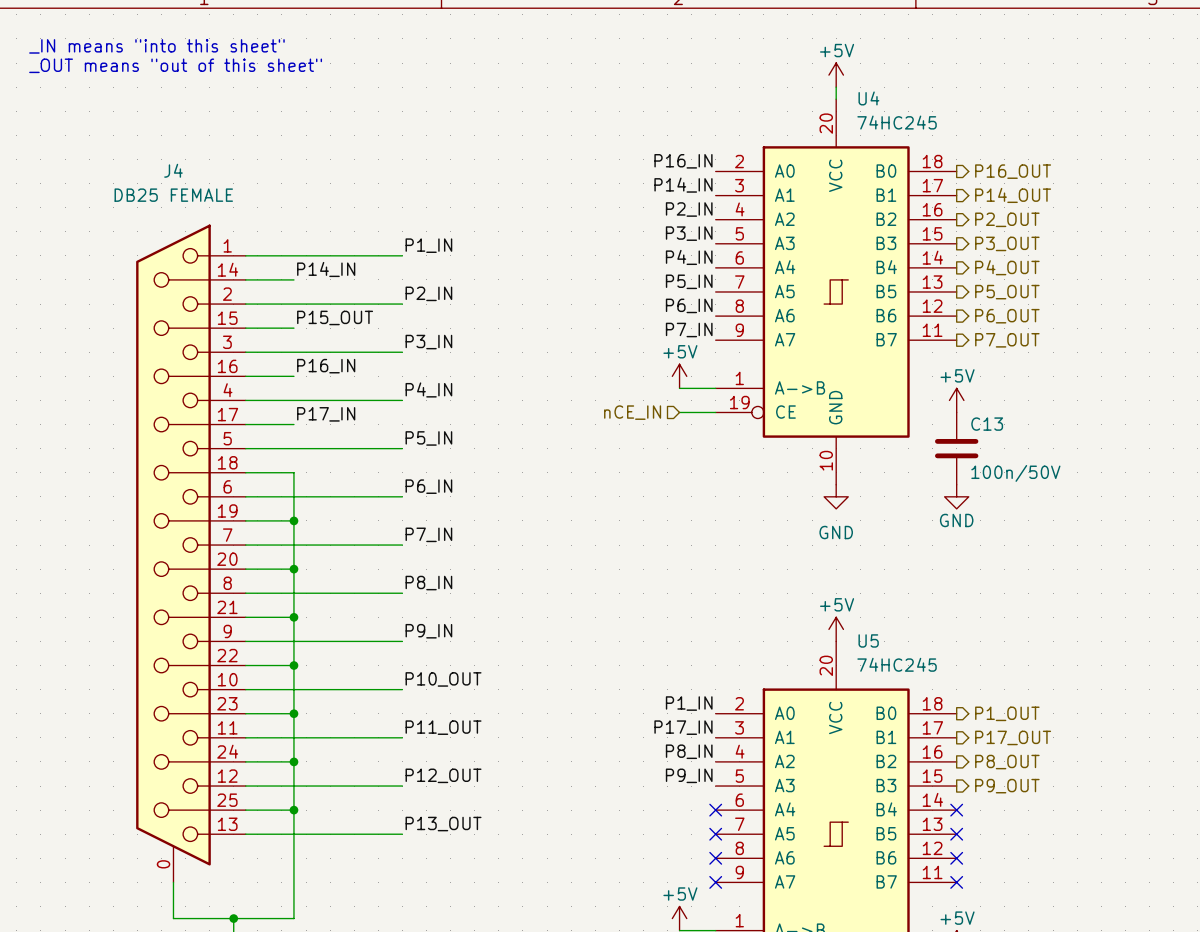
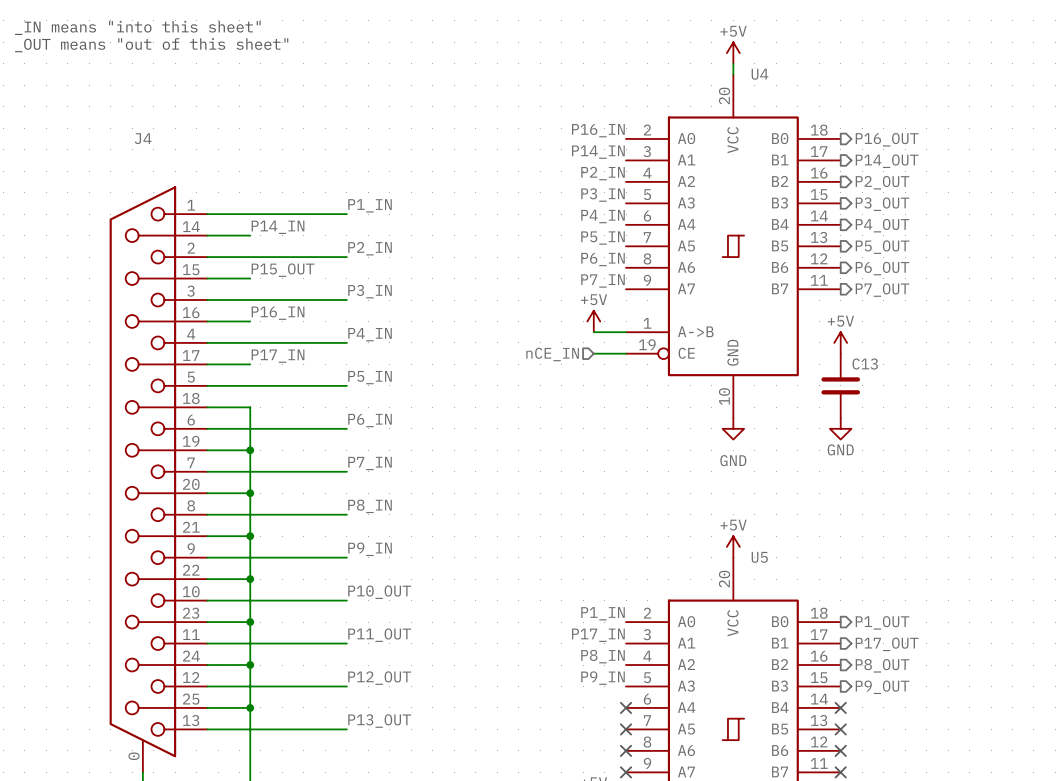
U4 value: 74HC245 (897, 122) -> none
J4 value: DB25 FEMALE (173, 195) -> none
C13 value: 100n/50V (1015, 473) -> none
U5 value: 74HC245 (897, 664) -> none

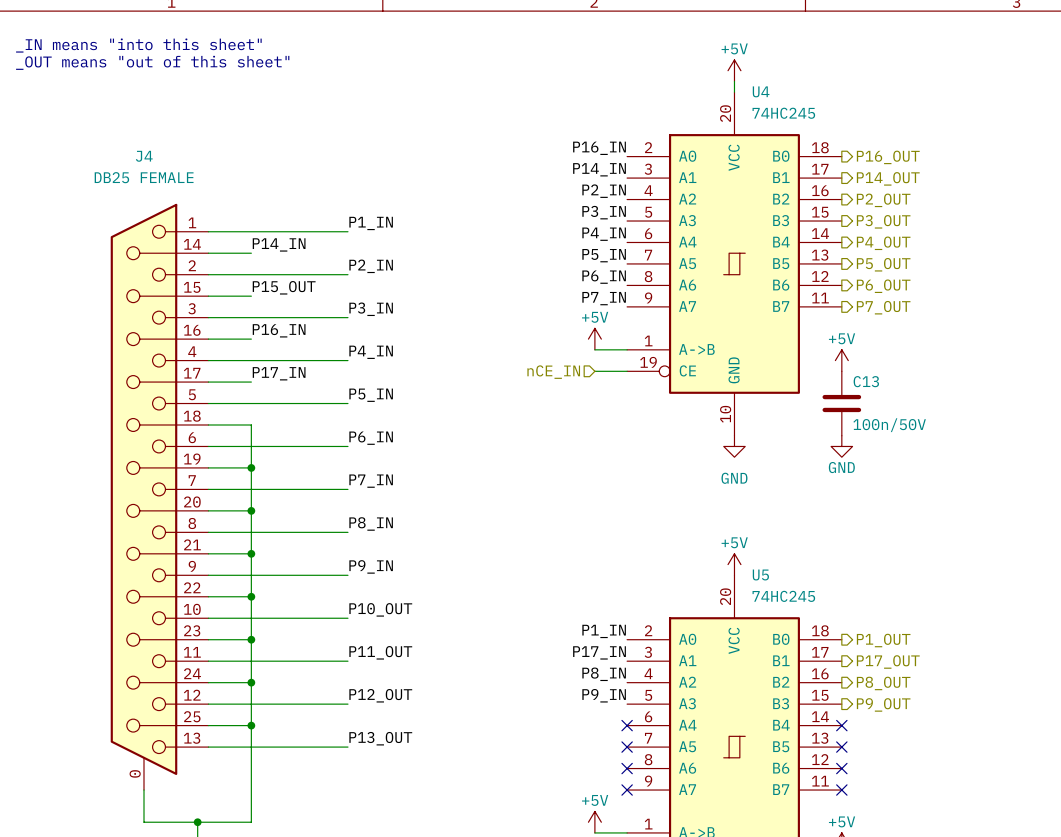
U4 value: none -> 74HC245 (783, 113)
J4 value: none -> DB25 FEMALE (144, 177)
C13 value: none -> 100n/50V (889, 425)
U5 value: none -> 74HC245 (783, 596)

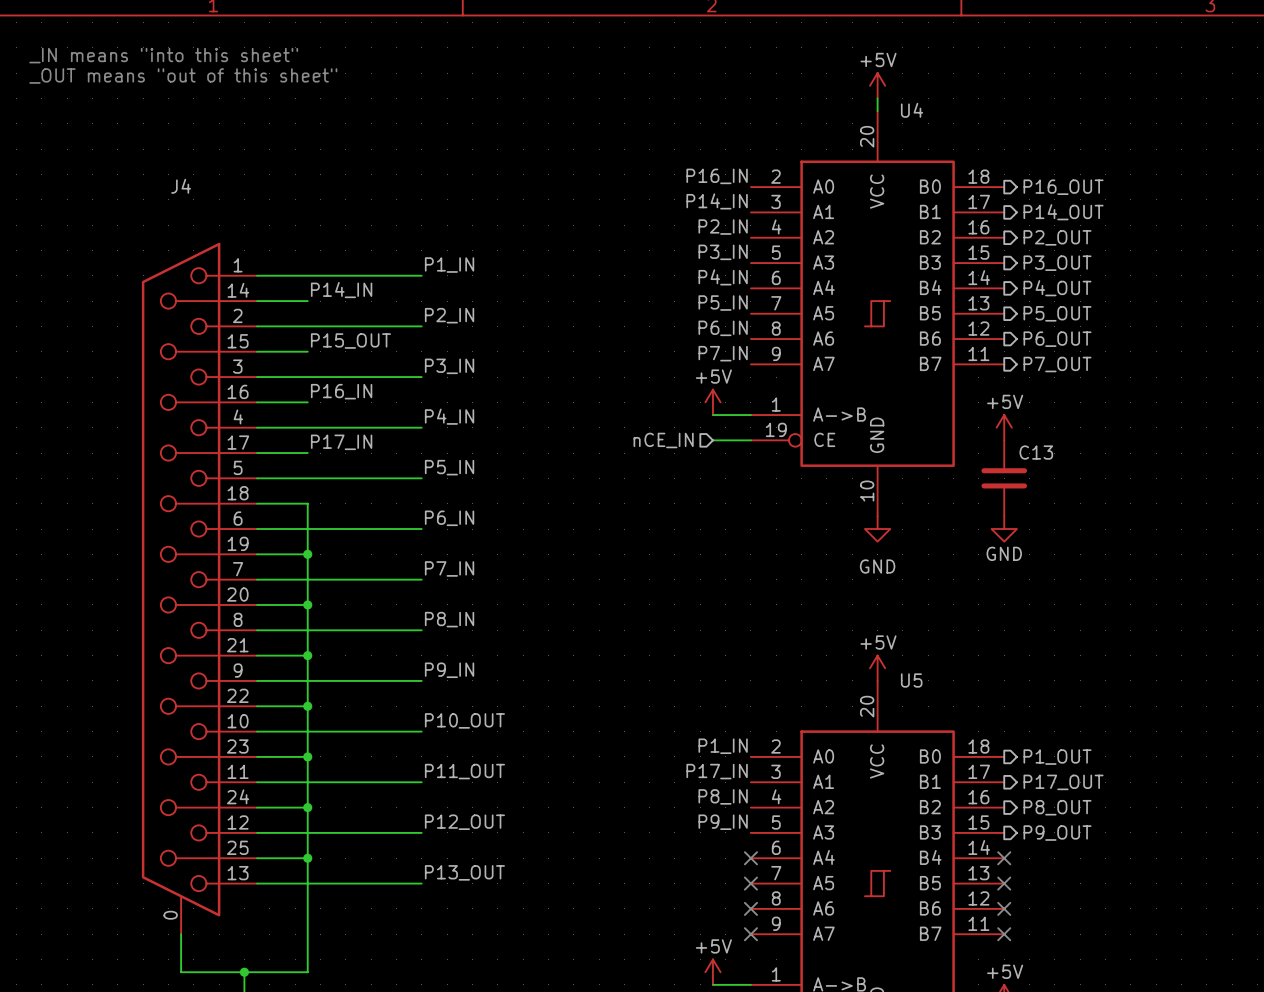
U4 value: 74HC245 (783, 113) -> none
J4 value: DB25 FEMALE (144, 177) -> none
C13 value: 100n/50V (889, 425) -> none
U5 value: 74HC245 (783, 596) -> none

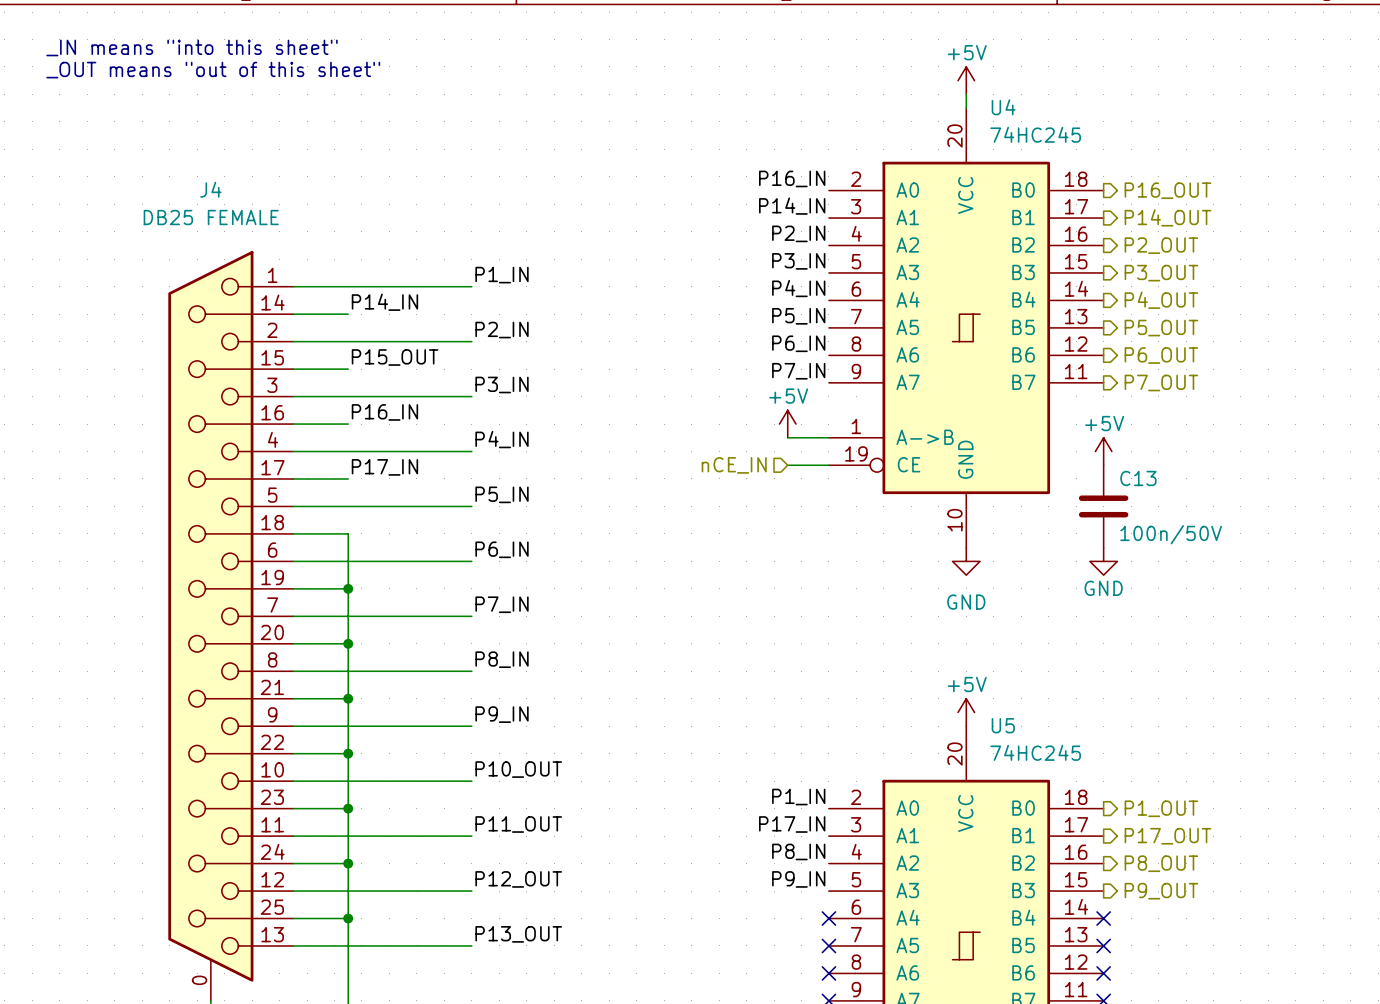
U4 value: none -> 74HC245 (1035, 134)
J4 value: none -> DB25 FEMALE (211, 217)
C13 value: none -> 100n/50V (1171, 534)
U5 value: none -> 74HC245 (1035, 752)

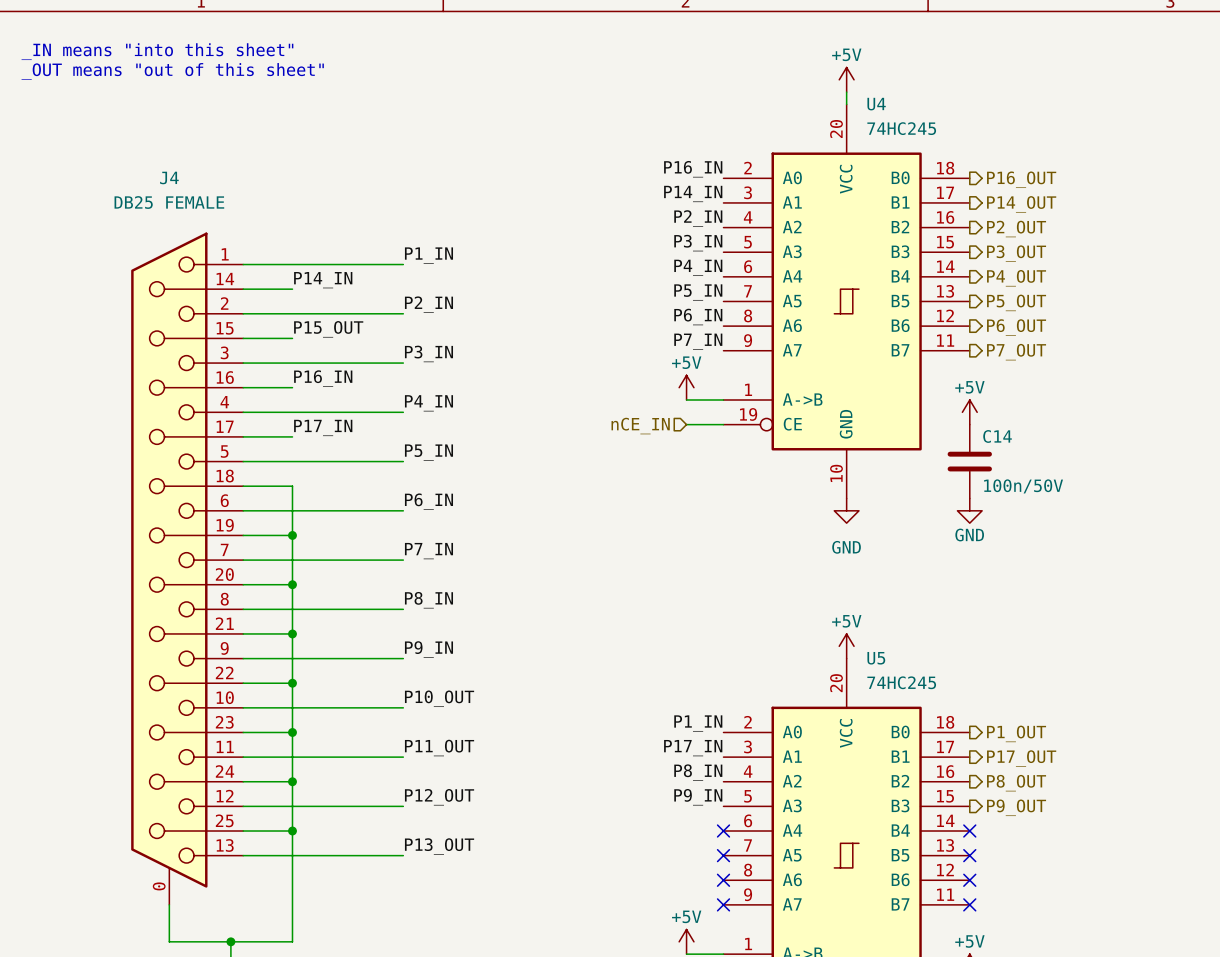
C13 name: C13 (1138, 478) -> C14 (997, 436)

